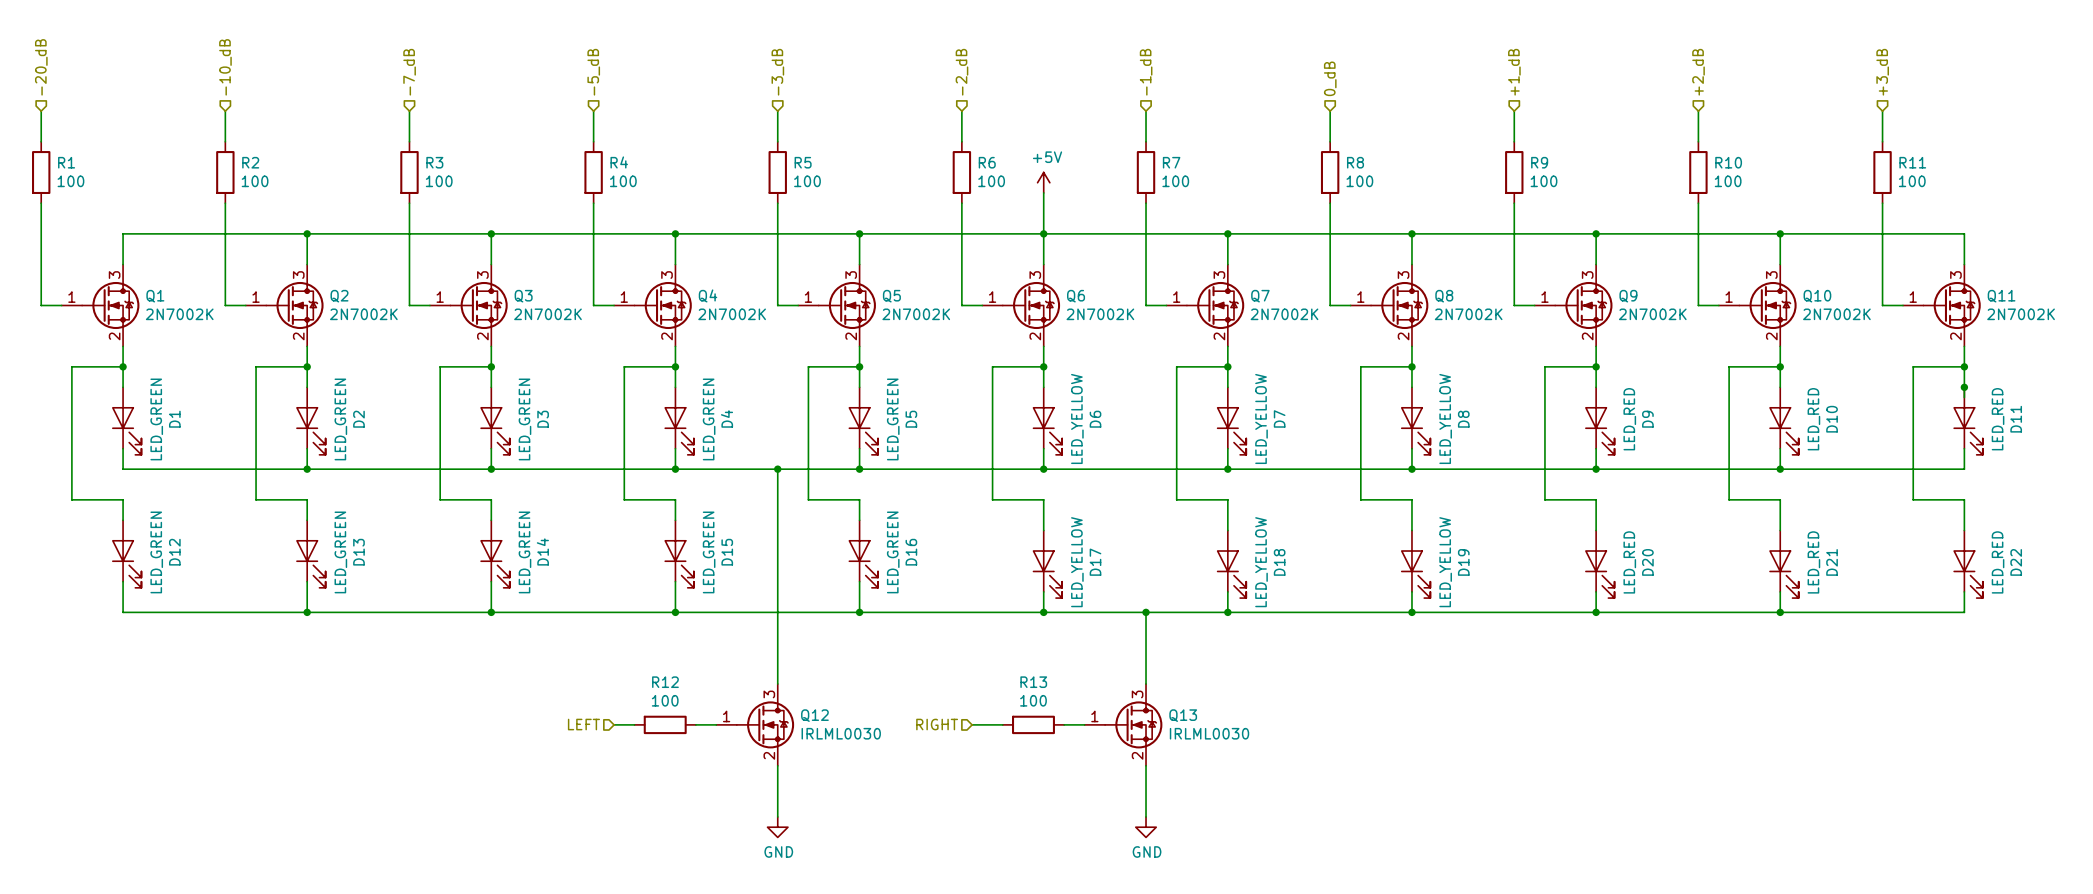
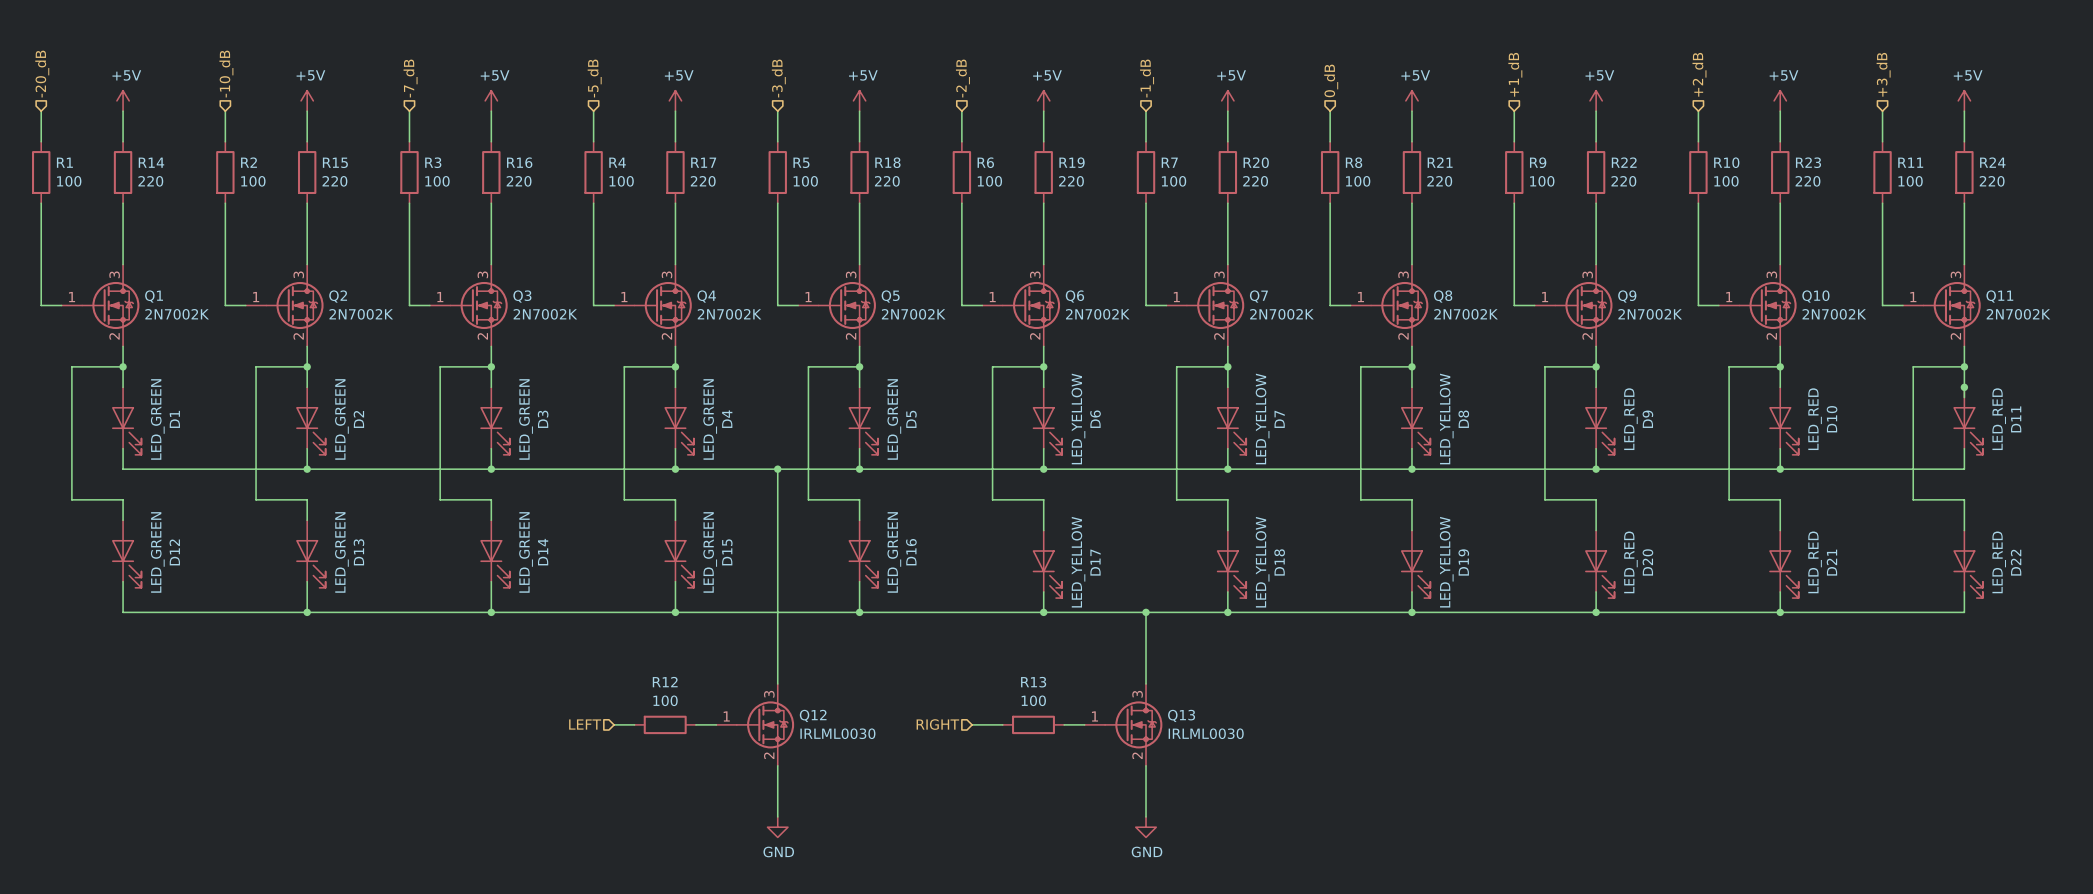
power symbol: none -> +5V (123, 100)
power symbol: none -> +5V (307, 100)
power symbol: none -> +5V (491, 100)
power symbol: none -> +5V (675, 100)
power symbol: none -> +5V (859, 100)
power symbol: none -> +5V (1227, 100)
power symbol: none -> +5V (1411, 100)
power symbol: none -> +5V (1596, 100)
power symbol: none -> +5V (1780, 100)
power symbol: none -> +5V (1964, 100)
wire: none -> (123, 111) (123, 141)
wire: none -> (307, 111) (307, 141)
wire: none -> (491, 111) (491, 141)
wire: none -> (675, 111) (675, 141)
wire: none -> (859, 111) (859, 141)
wire: none -> (1043, 111) (1043, 141)
wire: none -> (1227, 111) (1227, 141)
wire: none -> (1411, 111) (1411, 141)
wire: none -> (1596, 111) (1596, 141)
wire: none -> (1780, 111) (1780, 141)
wire: none -> (1964, 111) (1964, 141)
R14: none -> 220 (123, 172)
R15: none -> 220 (307, 172)
R16: none -> 220 (491, 172)
R17: none -> 220 (675, 172)
R18: none -> 220 (859, 172)
R19: none -> 220 (1043, 172)
R20: none -> 220 (1227, 172)
R21: none -> 220 (1411, 172)
R22: none -> 220 (1596, 172)
R23: none -> 220 (1780, 172)
R24: none -> 220 (1964, 172)
power symbol position: +5V (1043, 182) -> +5V (1043, 100)
wire: none -> (307, 203) (307, 233)
wire: none -> (491, 203) (491, 233)
wire: none -> (675, 203) (675, 233)
wire: none -> (859, 203) (859, 233)
wire: none -> (1227, 203) (1227, 233)
wire: none -> (1411, 203) (1411, 233)
wire: none -> (1596, 203) (1596, 233)
wire: none -> (1780, 203) (1780, 233)
wire: none -> (1964, 203) (1964, 233)
wire: (123, 233) (1964, 233) -> (123, 233) (123, 203)
junction: (307, 233) -> none
junction: (491, 233) -> none
junction: (675, 233) -> none
junction: (859, 233) -> none
junction: (1043, 233) -> none
junction: (1227, 233) -> none
junction: (1411, 233) -> none
junction: (1596, 233) -> none
junction: (1780, 233) -> none

